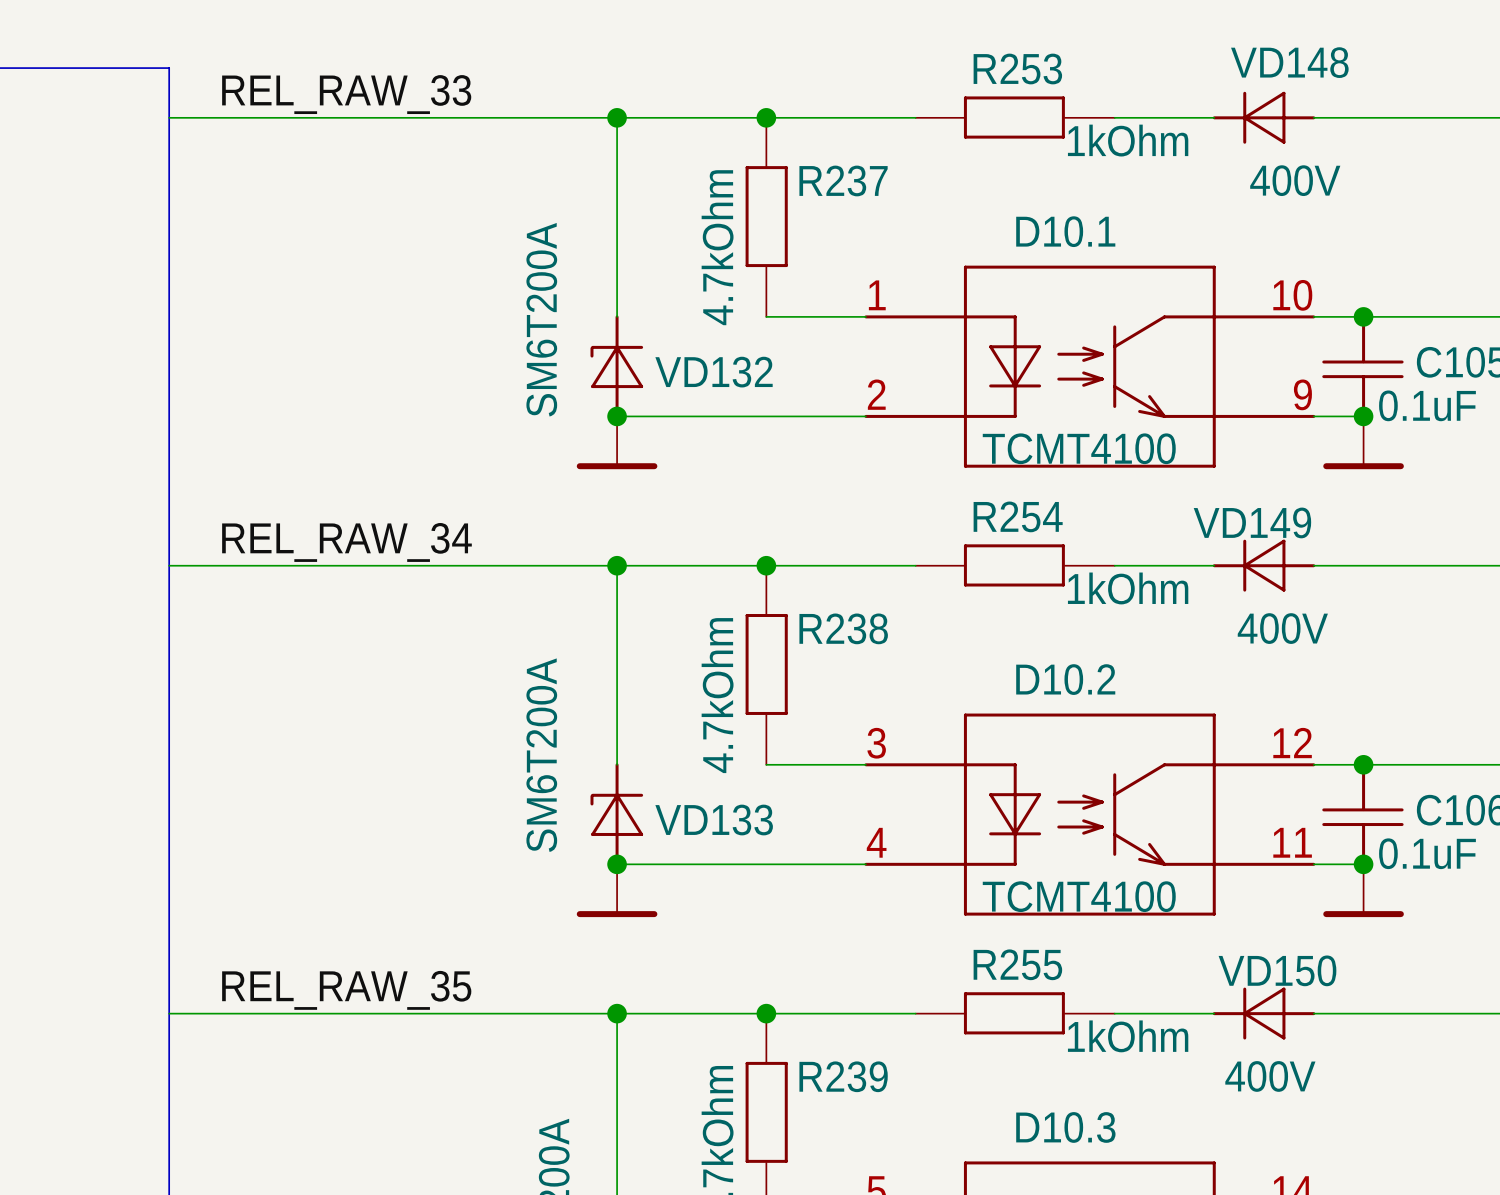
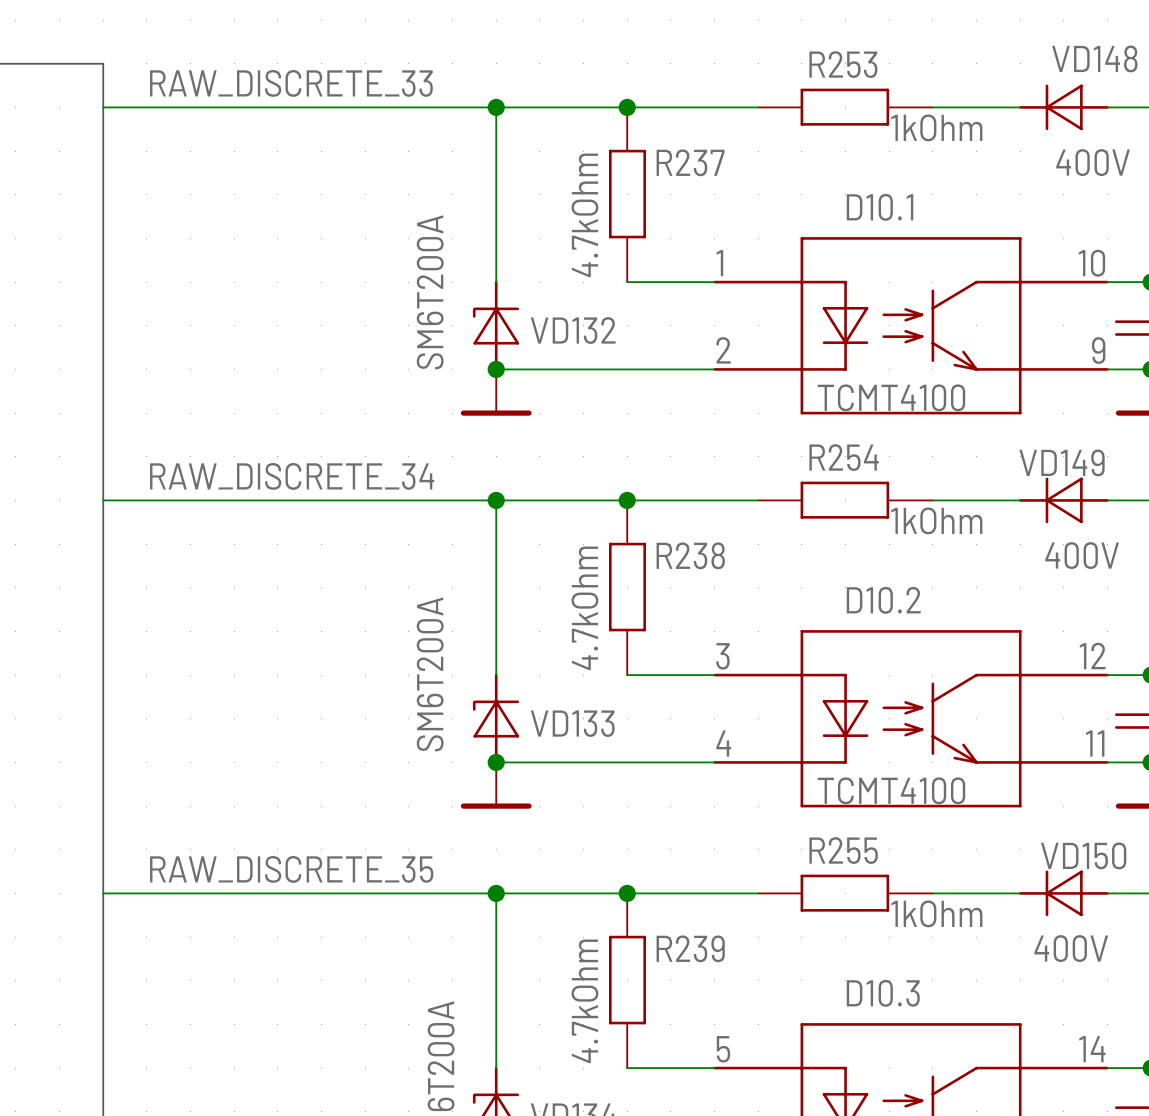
label: REL_RAW_33 (346, 94) -> RAW_DISCRETE_33 (291, 83)
label: REL_RAW_34 (346, 542) -> RAW_DISCRETE_34 (292, 476)
label: REL_RAW_35 (346, 990) -> RAW_DISCRETE_35 (291, 869)

